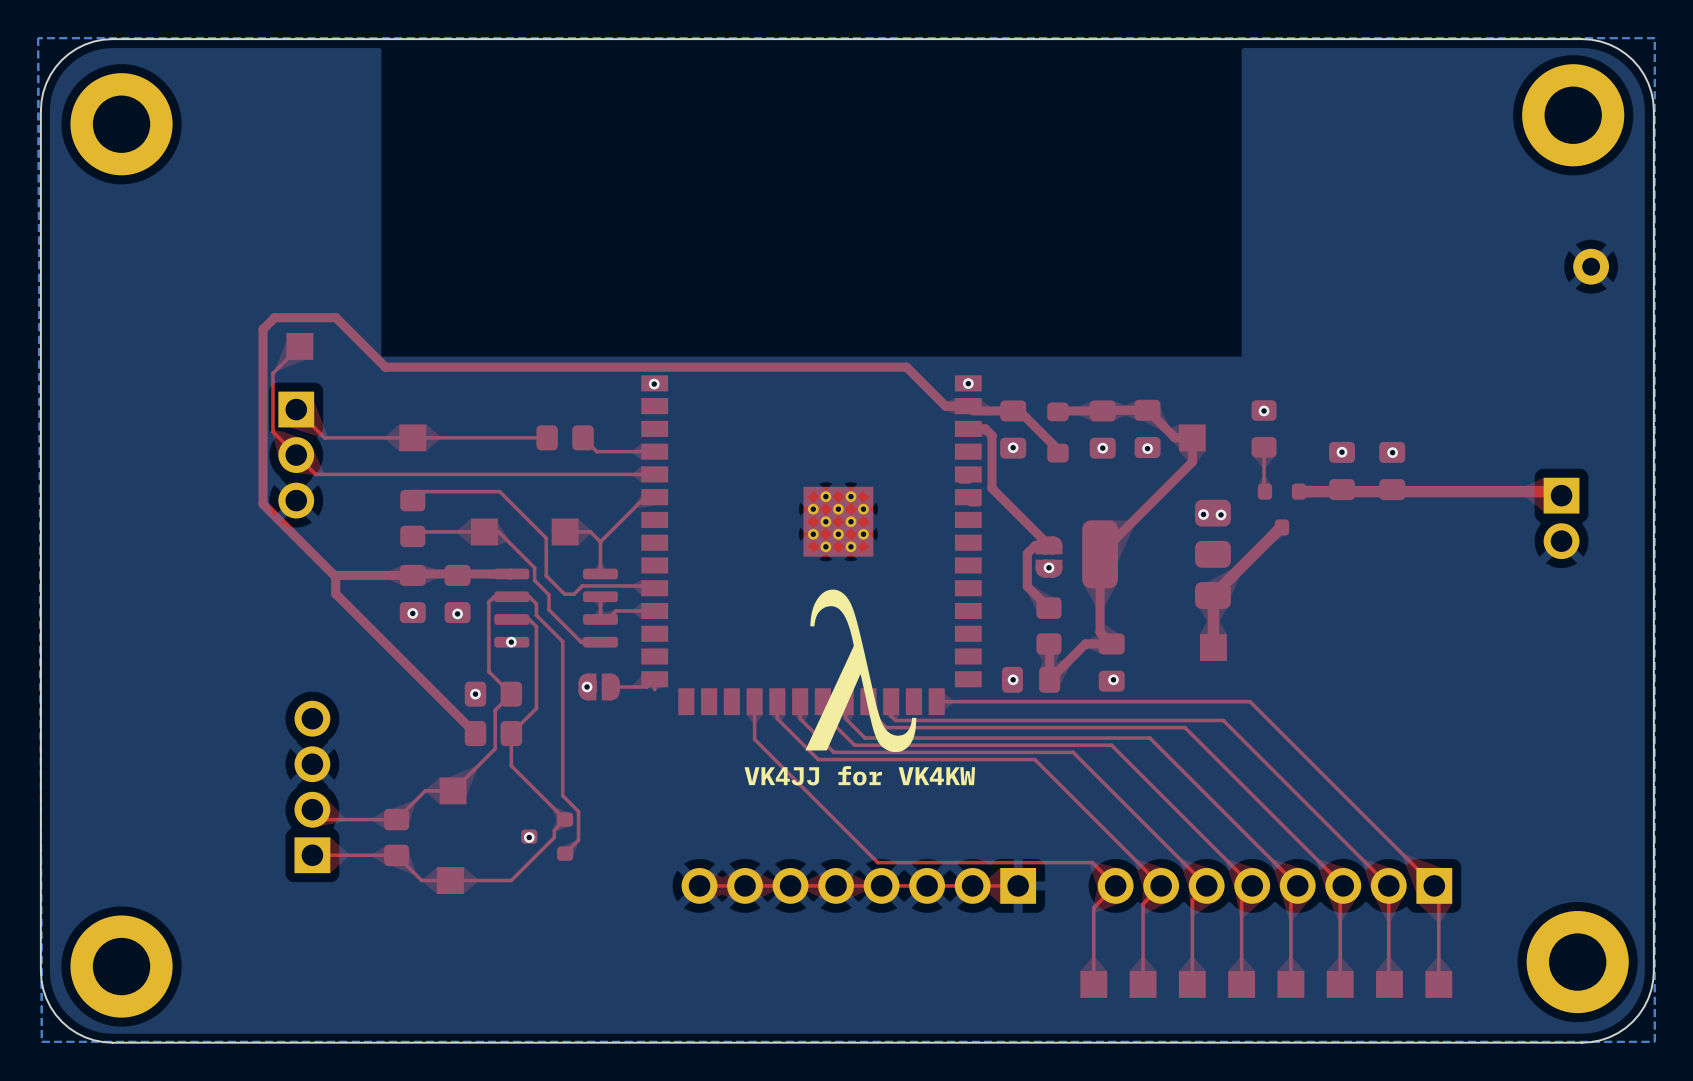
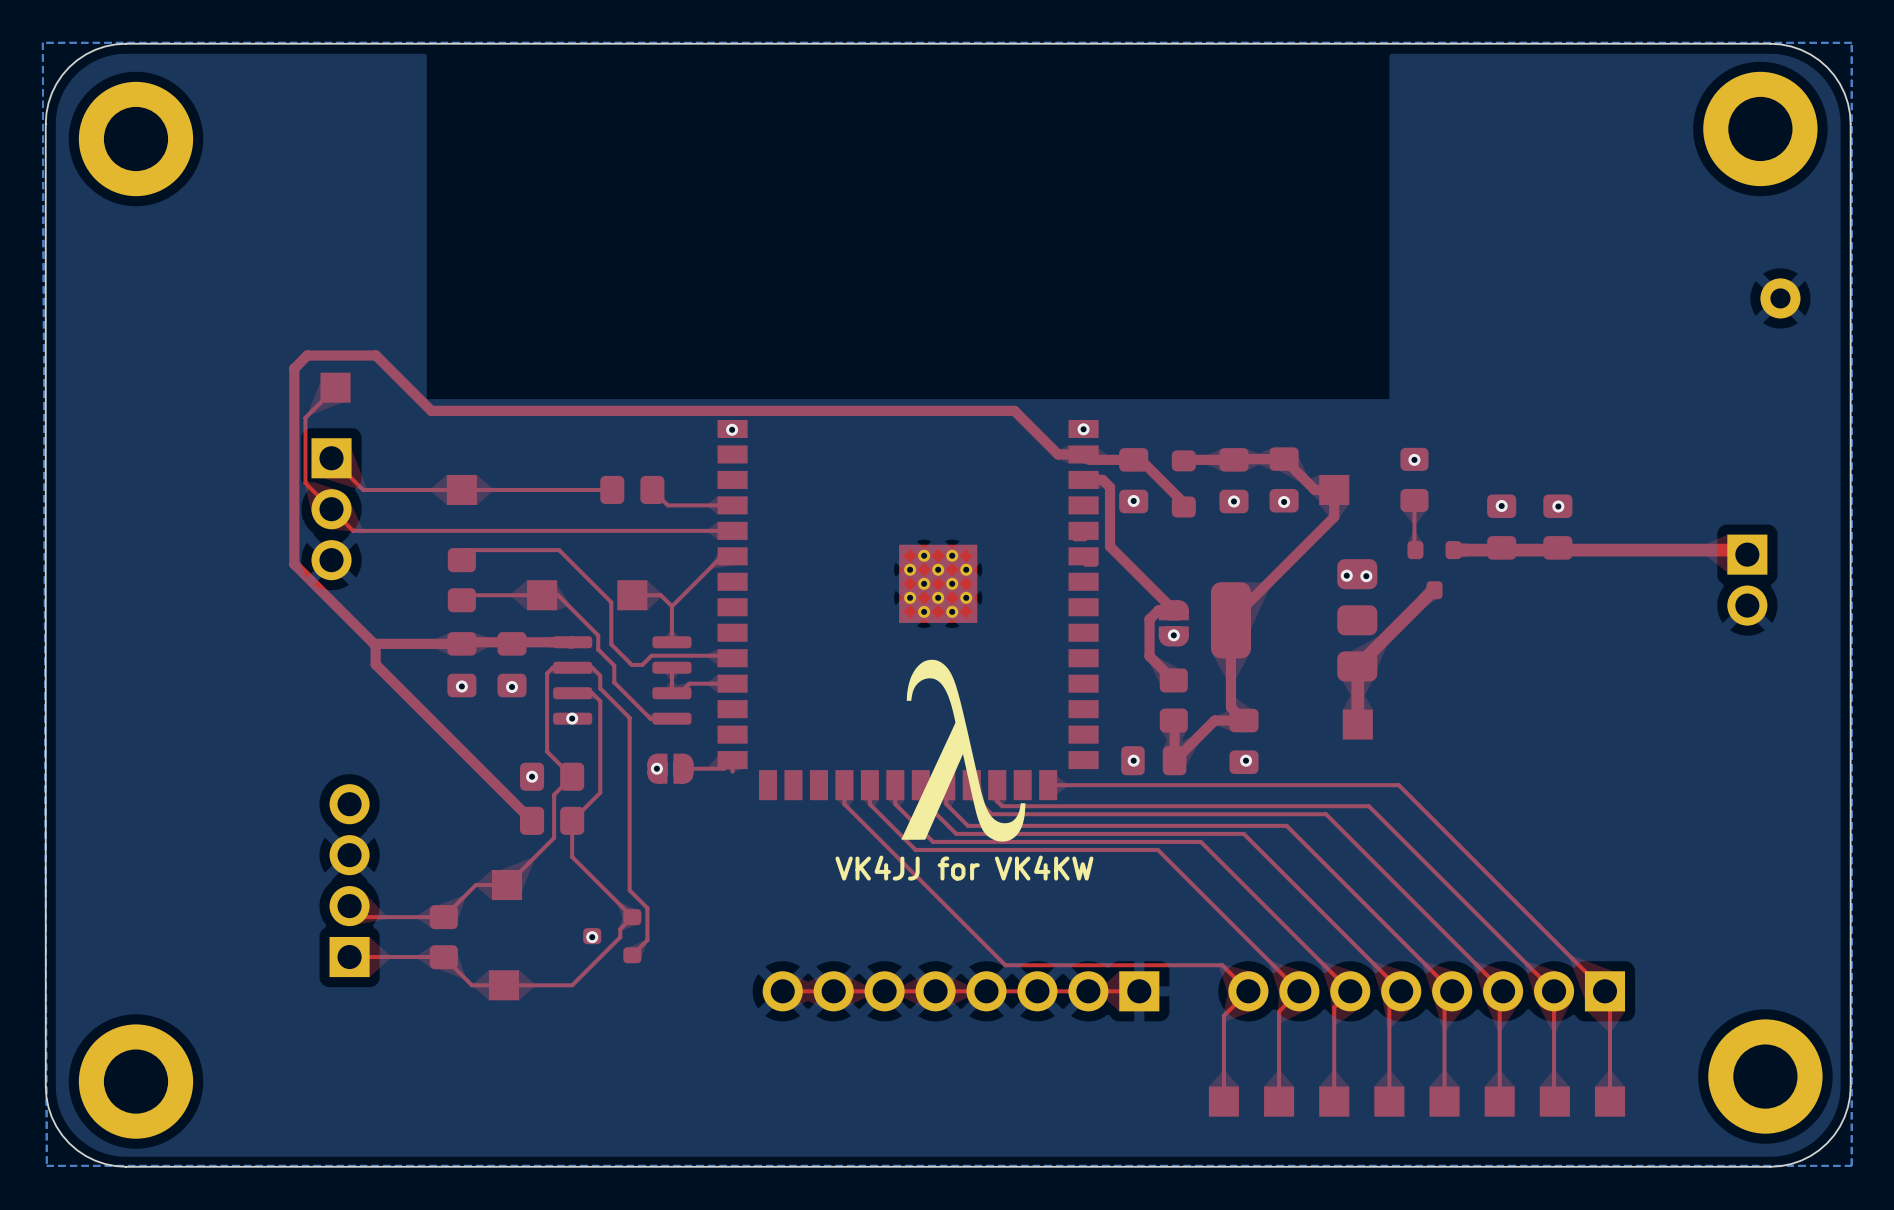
top track: (754, 718) (754, 739) (877, 862) (898, 862) -> (844, 804) (1005, 965)

